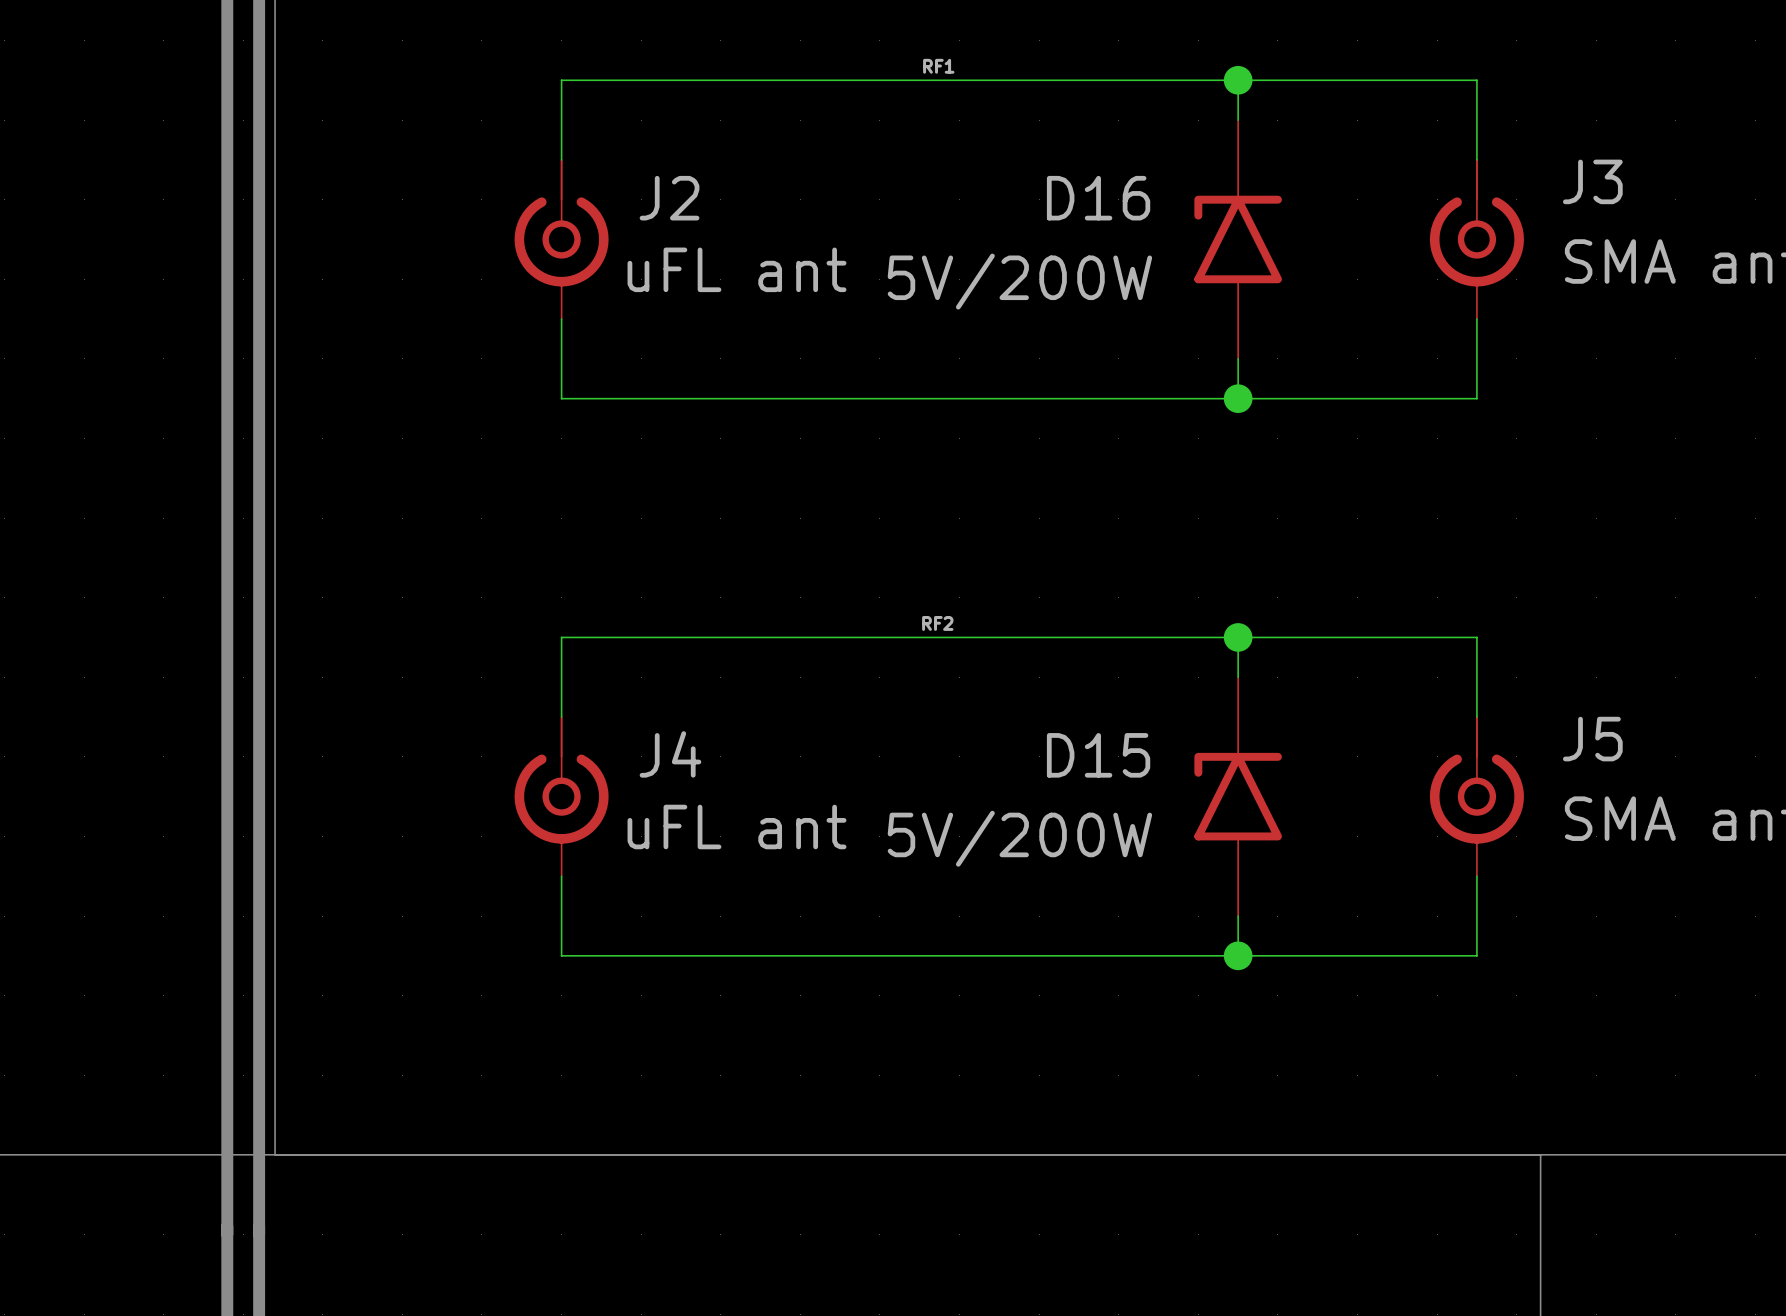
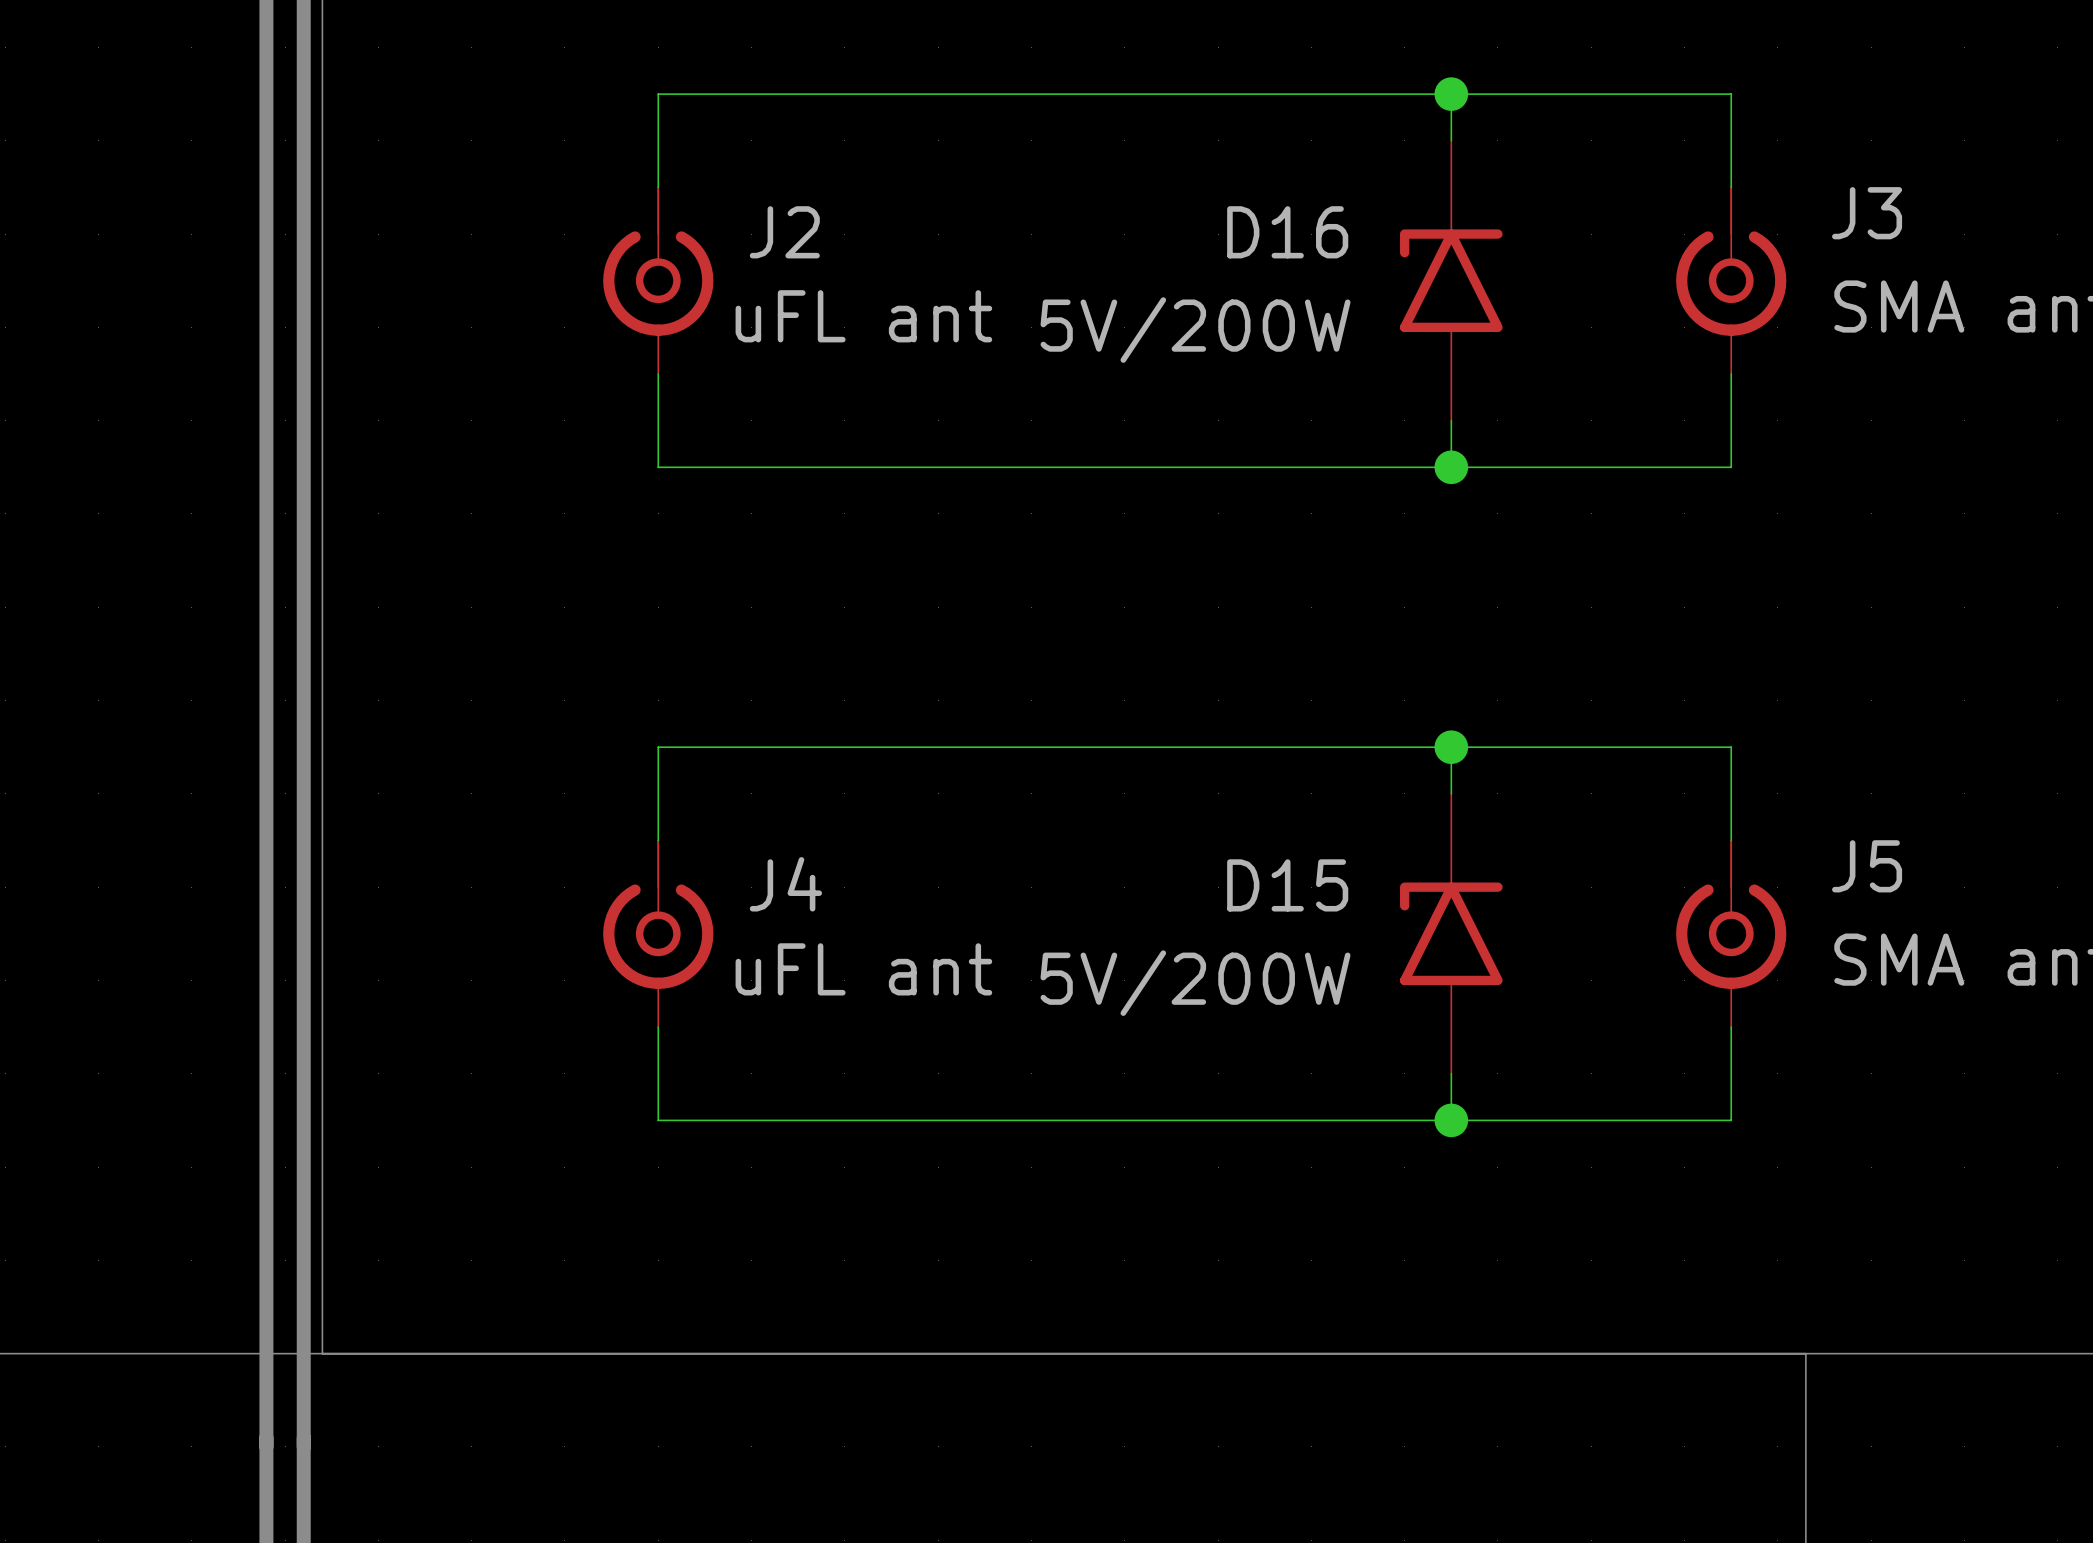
label: RF1 (938, 66) -> none
label: RF2 (937, 623) -> none

